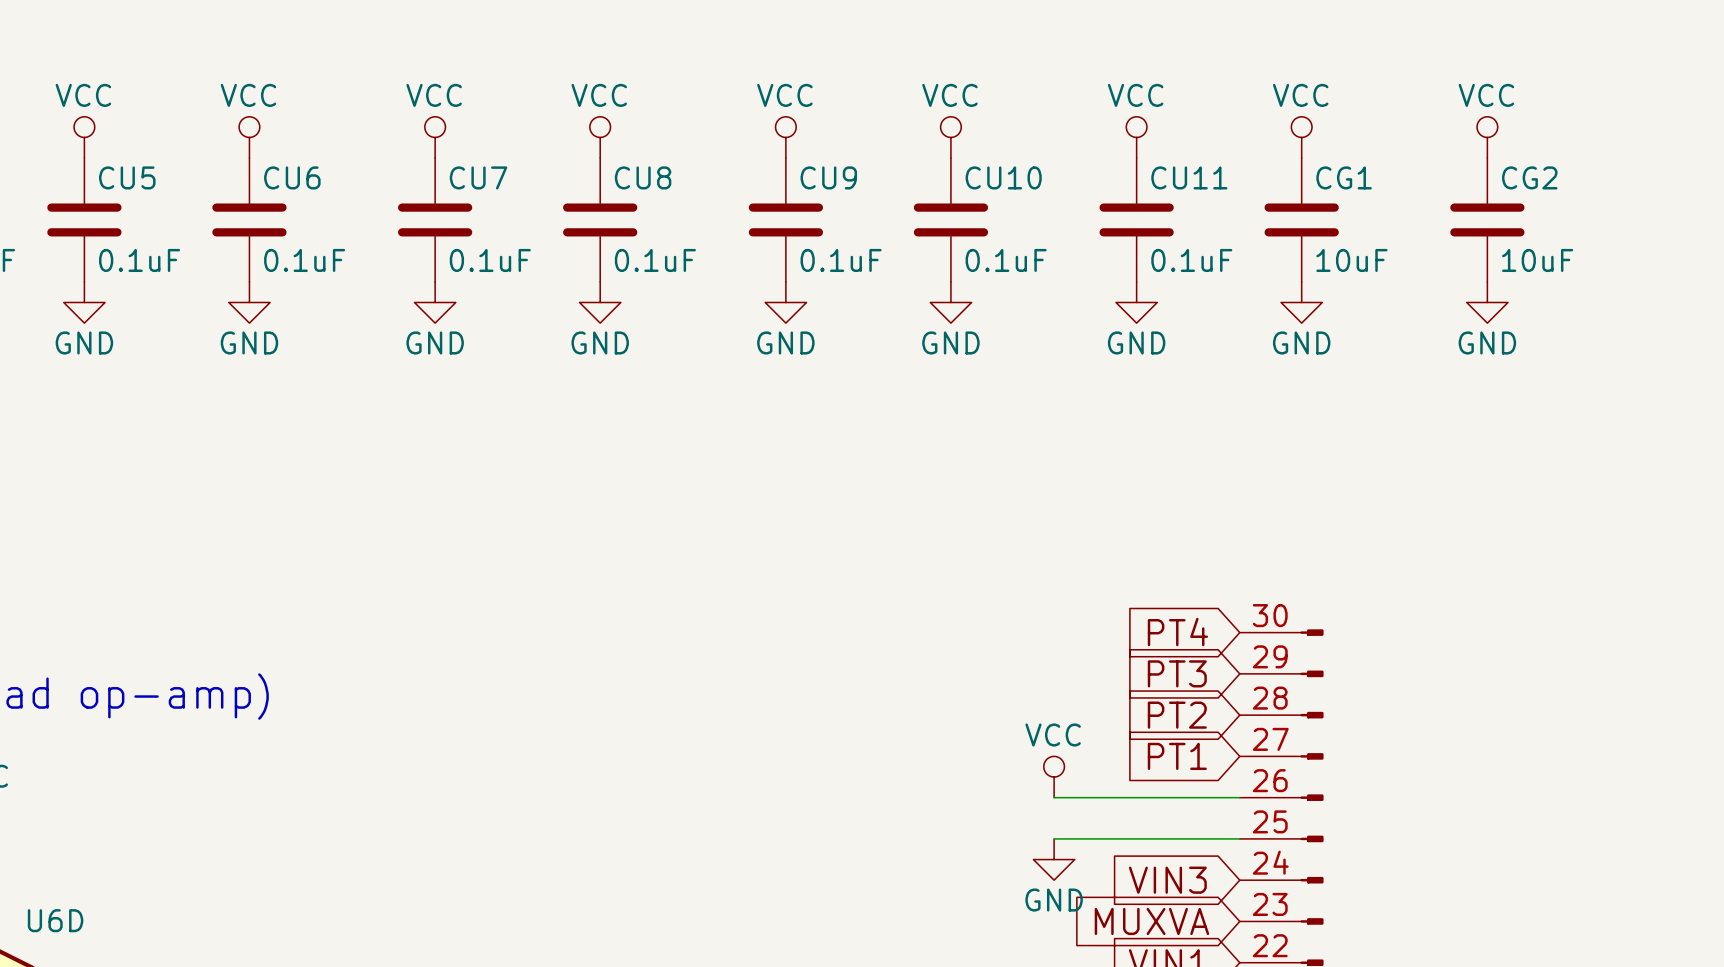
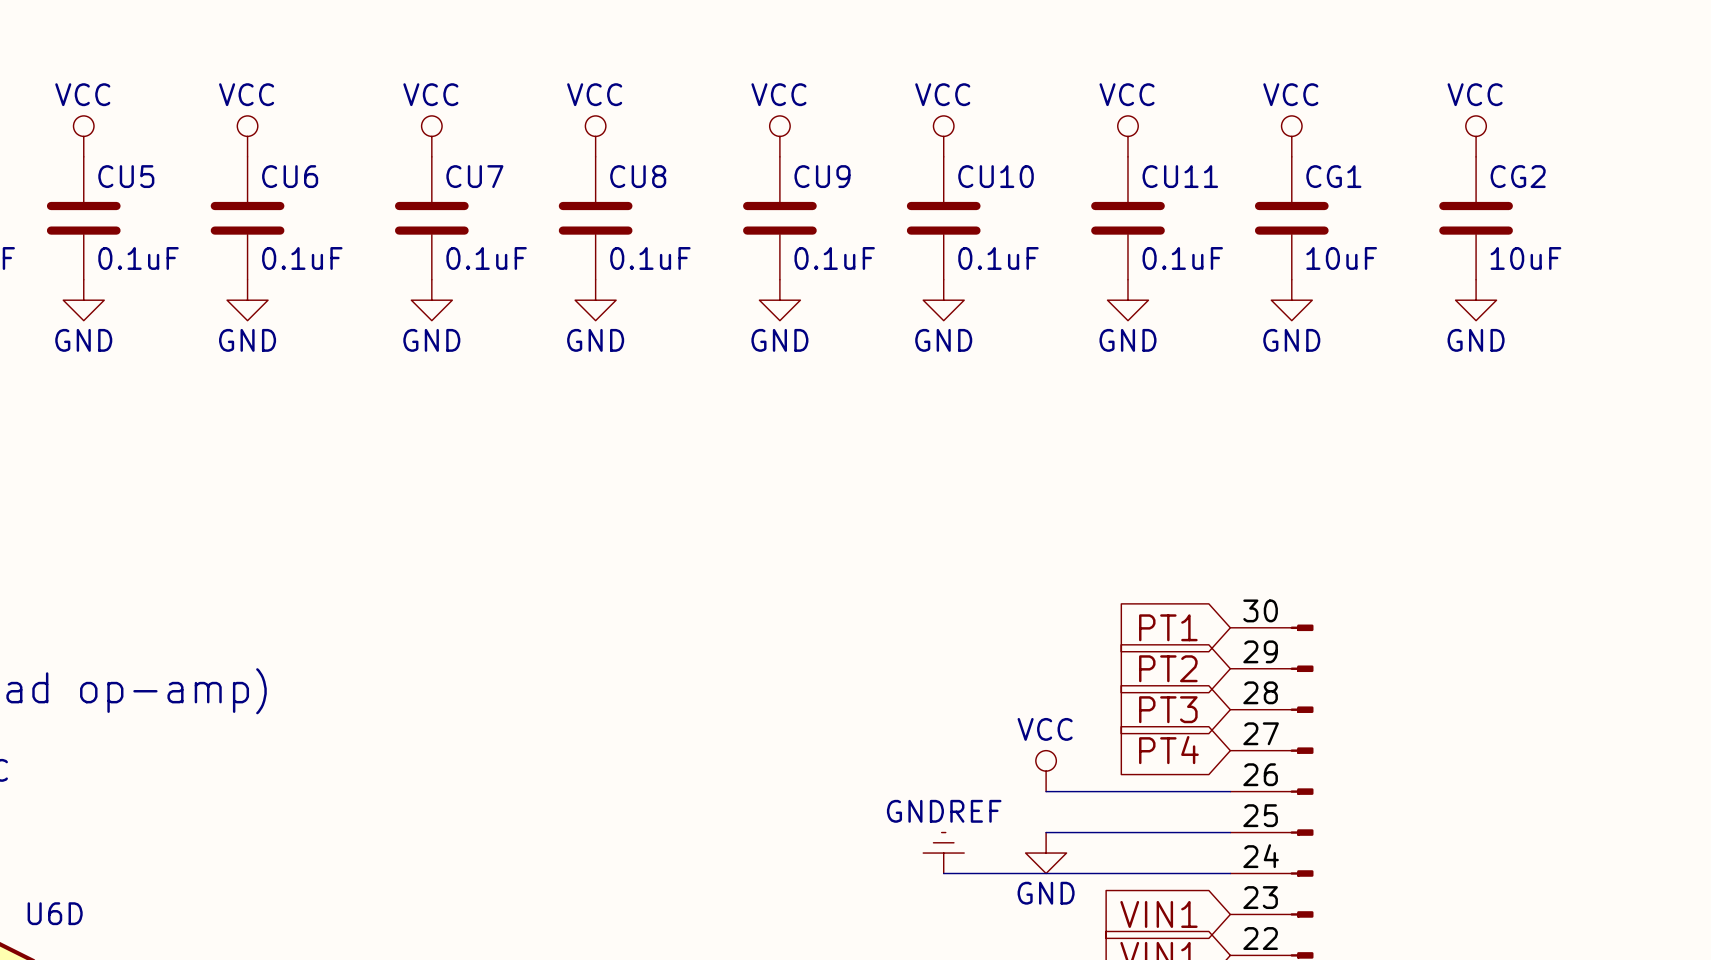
global label: PT4 (1177, 632) -> PT1 (1168, 627)
global label: PT3 (1177, 673) -> PT2 (1168, 668)
global label: PT2 (1177, 715) -> PT3 (1168, 709)
global label: PT1 (1177, 756) -> PT4 (1168, 750)
power symbol: none -> GNDREF (943, 853)
wire: none -> (943, 873) (1230, 873)
global label: VIN3 (1167, 880) -> none
global label: MUXVA (1151, 921) -> VIN1 (1158, 914)

